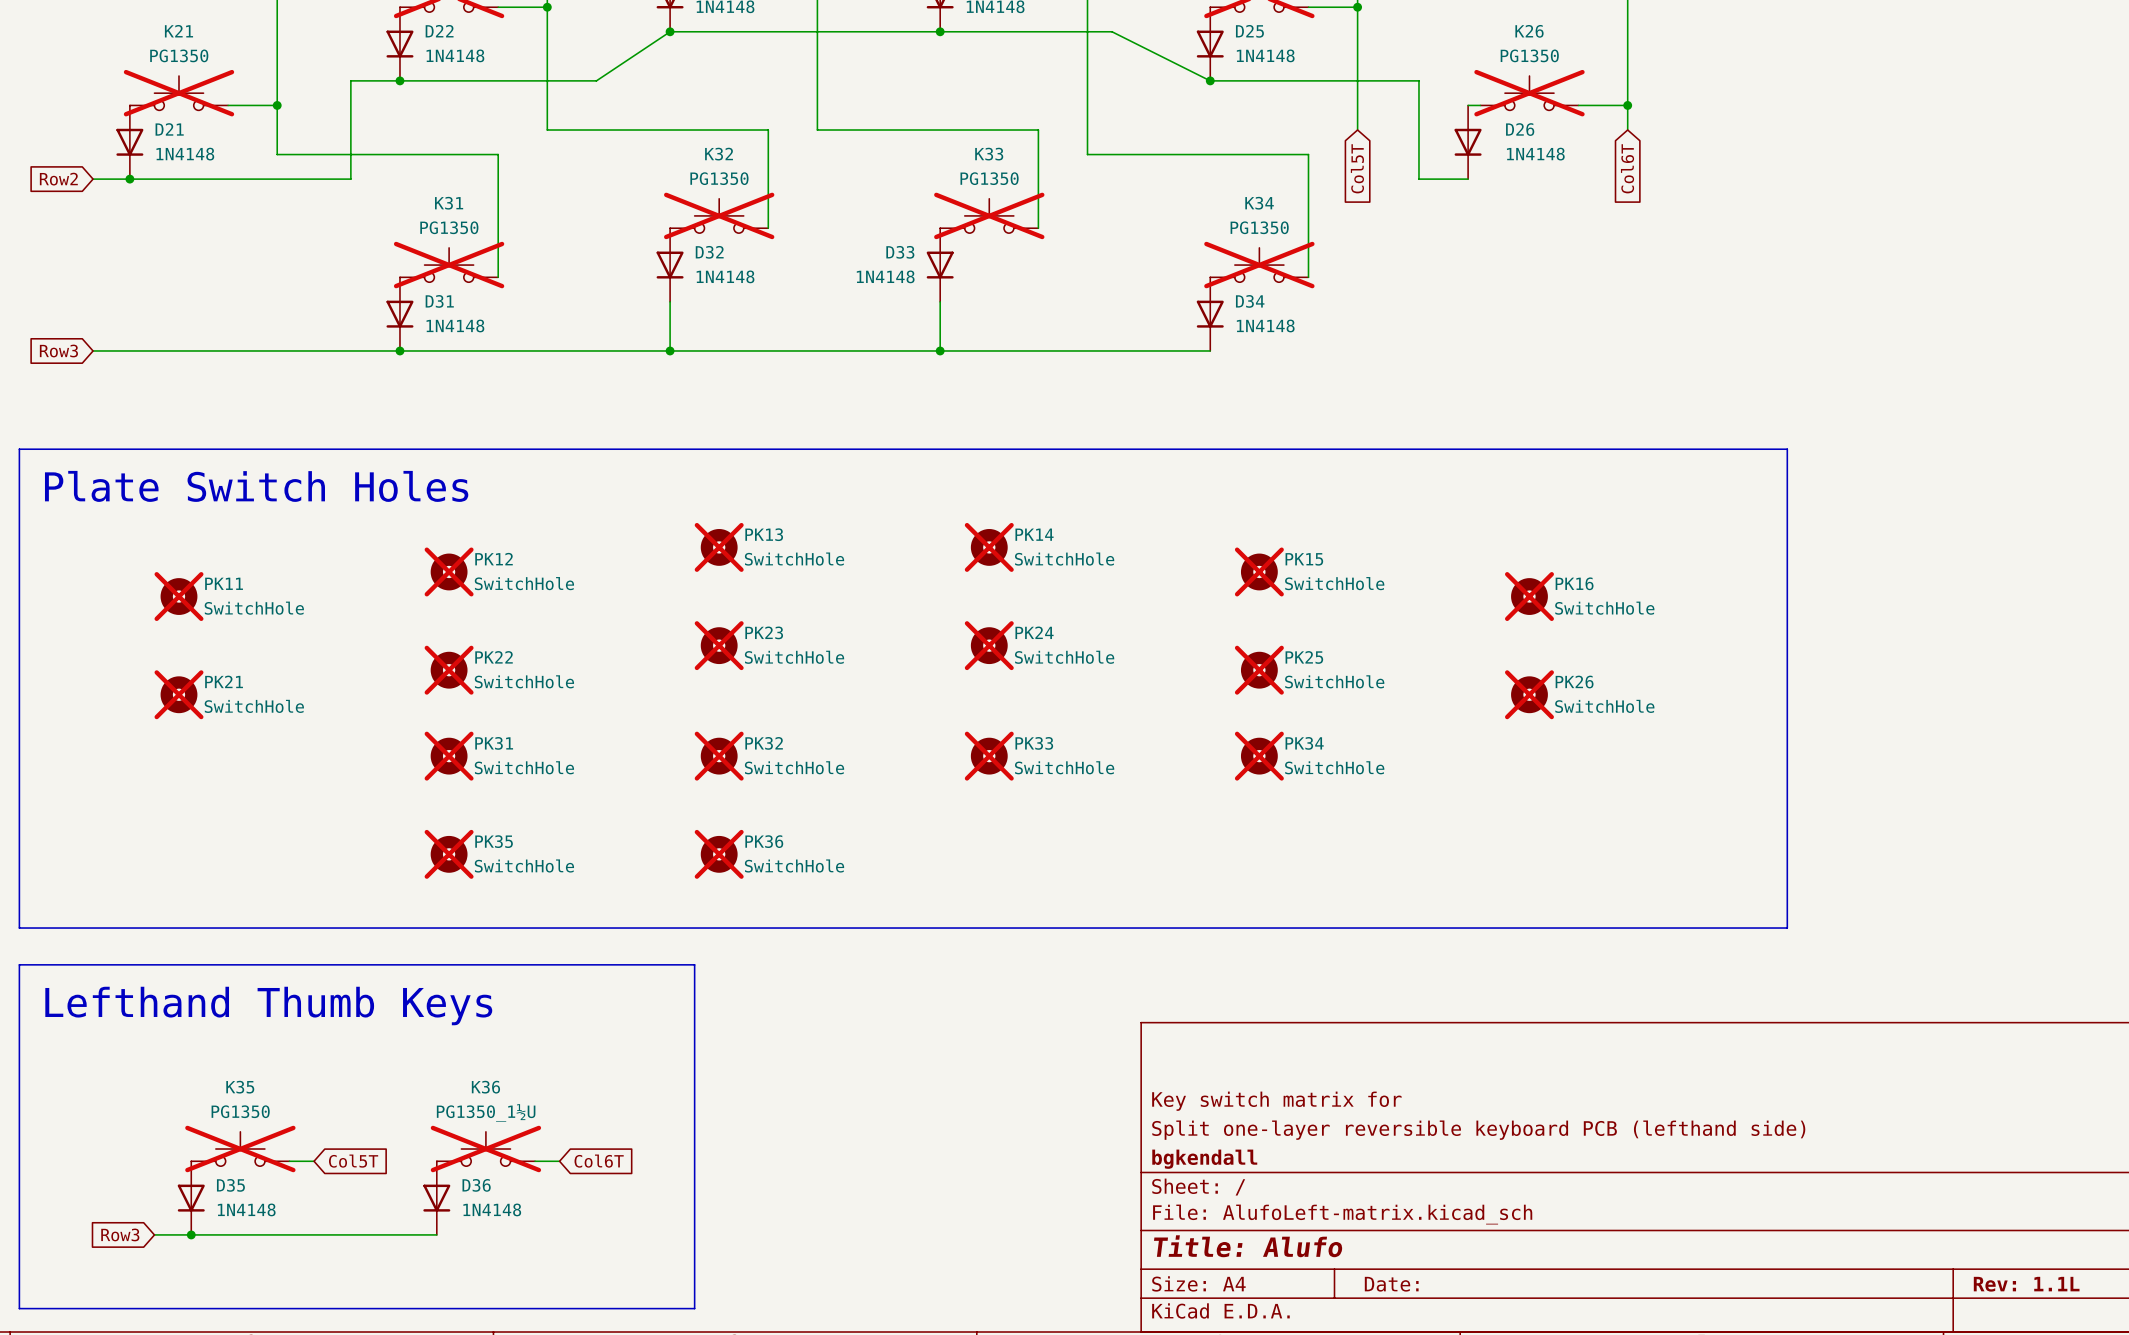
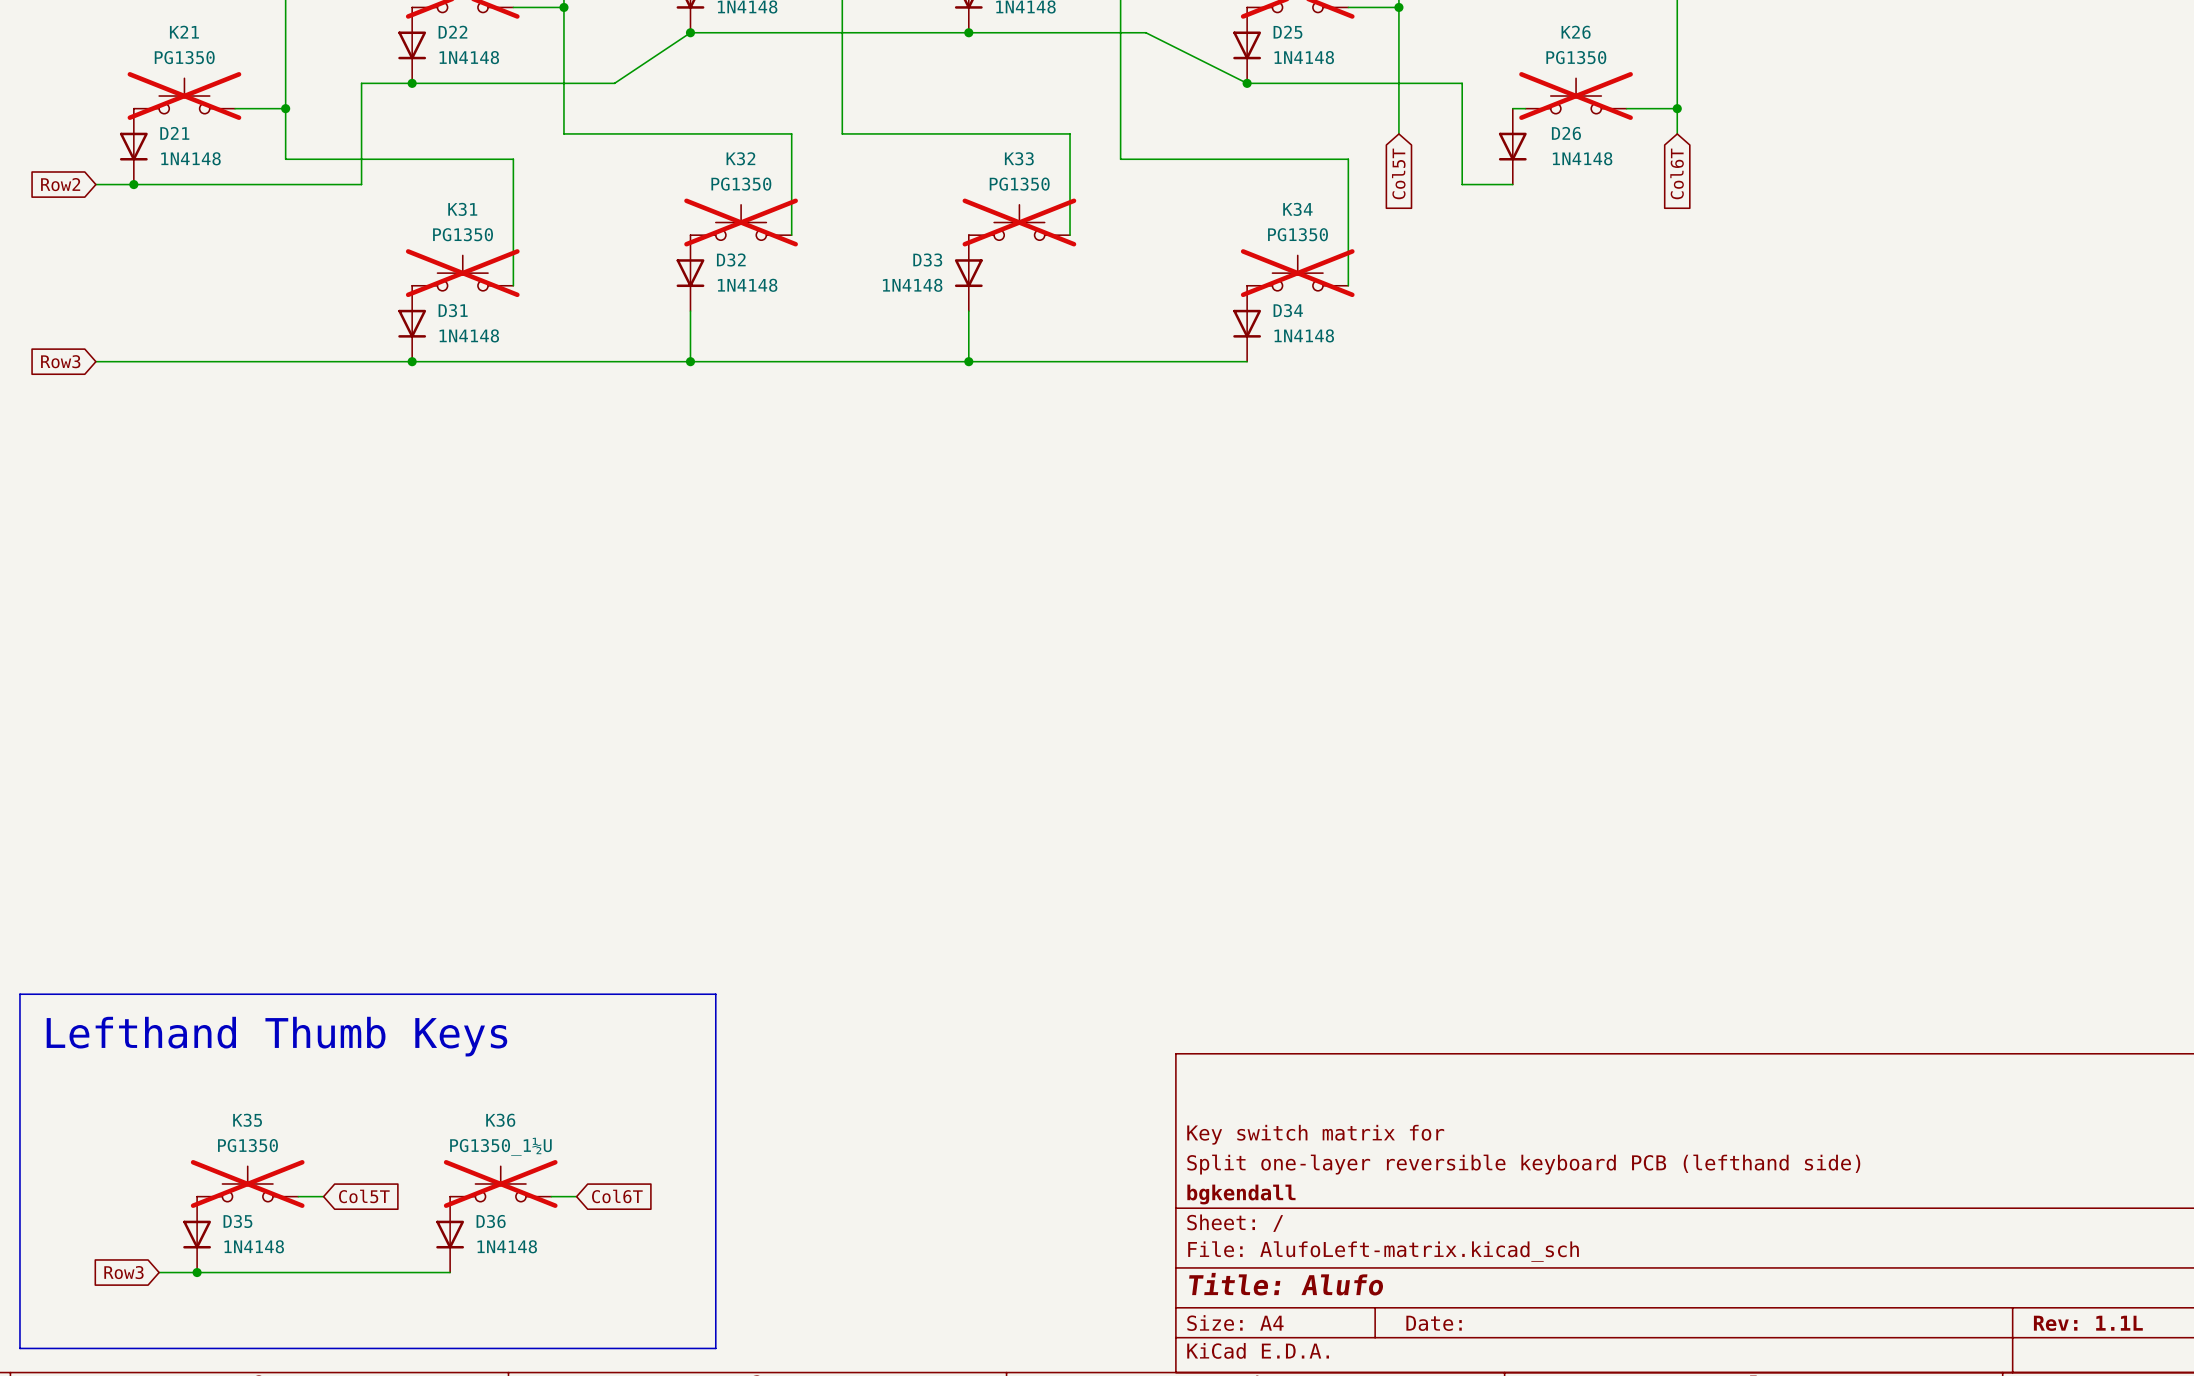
line: (19, 449) (1787, 449) (1787, 928) (19, 928) (19, 449) -> none
text: Plate Switch Holes (256, 486) -> none
PK13: SwitchHole (719, 547) -> none
PK14: SwitchHole (989, 547) -> none
PK12: SwitchHole (449, 571) -> none
PK15: SwitchHole (1259, 571) -> none
PK11: SwitchHole (178, 596) -> none
PK16: SwitchHole (1529, 596) -> none
PK23: SwitchHole (719, 645) -> none
PK24: SwitchHole (989, 645) -> none
PK22: SwitchHole (449, 670) -> none
PK25: SwitchHole (1259, 670) -> none
PK21: SwitchHole (178, 694) -> none
PK26: SwitchHole (1529, 694) -> none
PK31: SwitchHole (449, 756) -> none
PK32: SwitchHole (719, 756) -> none
PK33: SwitchHole (989, 756) -> none
PK34: SwitchHole (1259, 756) -> none
PK35: SwitchHole (449, 854) -> none
PK36: SwitchHole (719, 854) -> none

